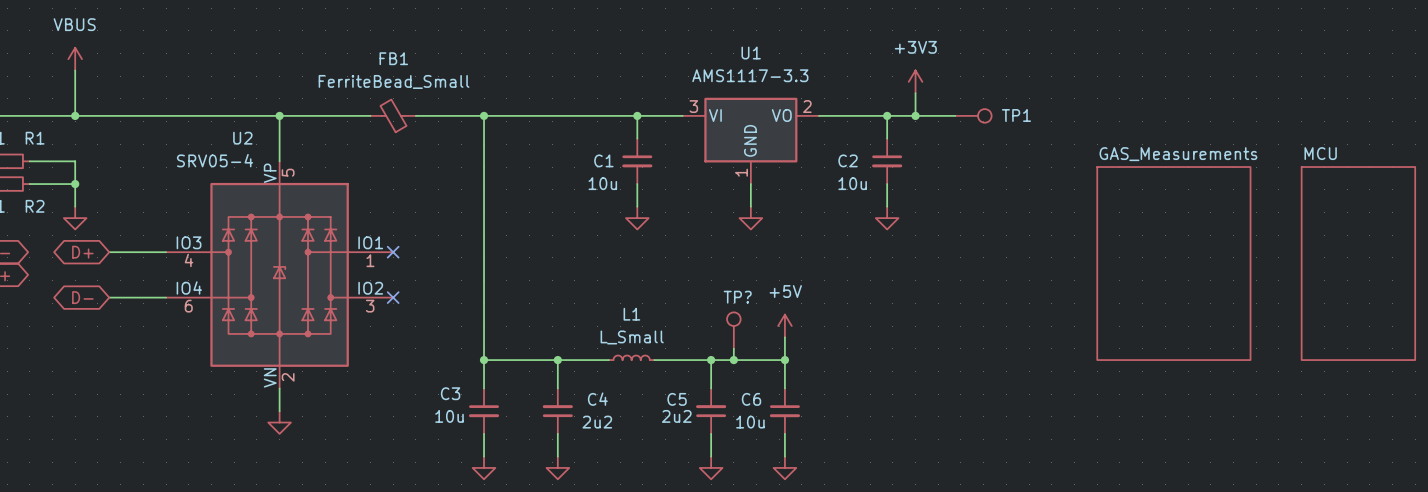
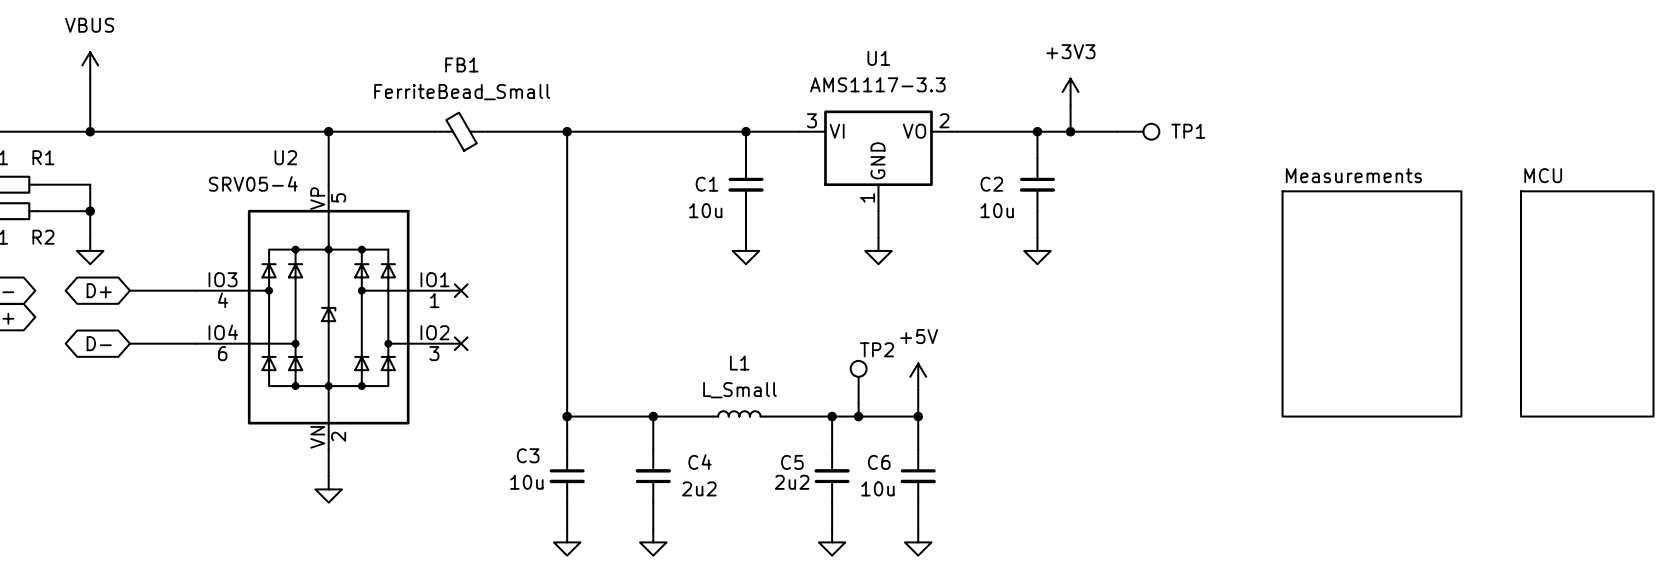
sheet GAS_Measurements name: GAS_Measurements (1178, 154) -> Measurements (1353, 175)
TP? name: TP? (737, 297) -> TP2 (877, 349)

